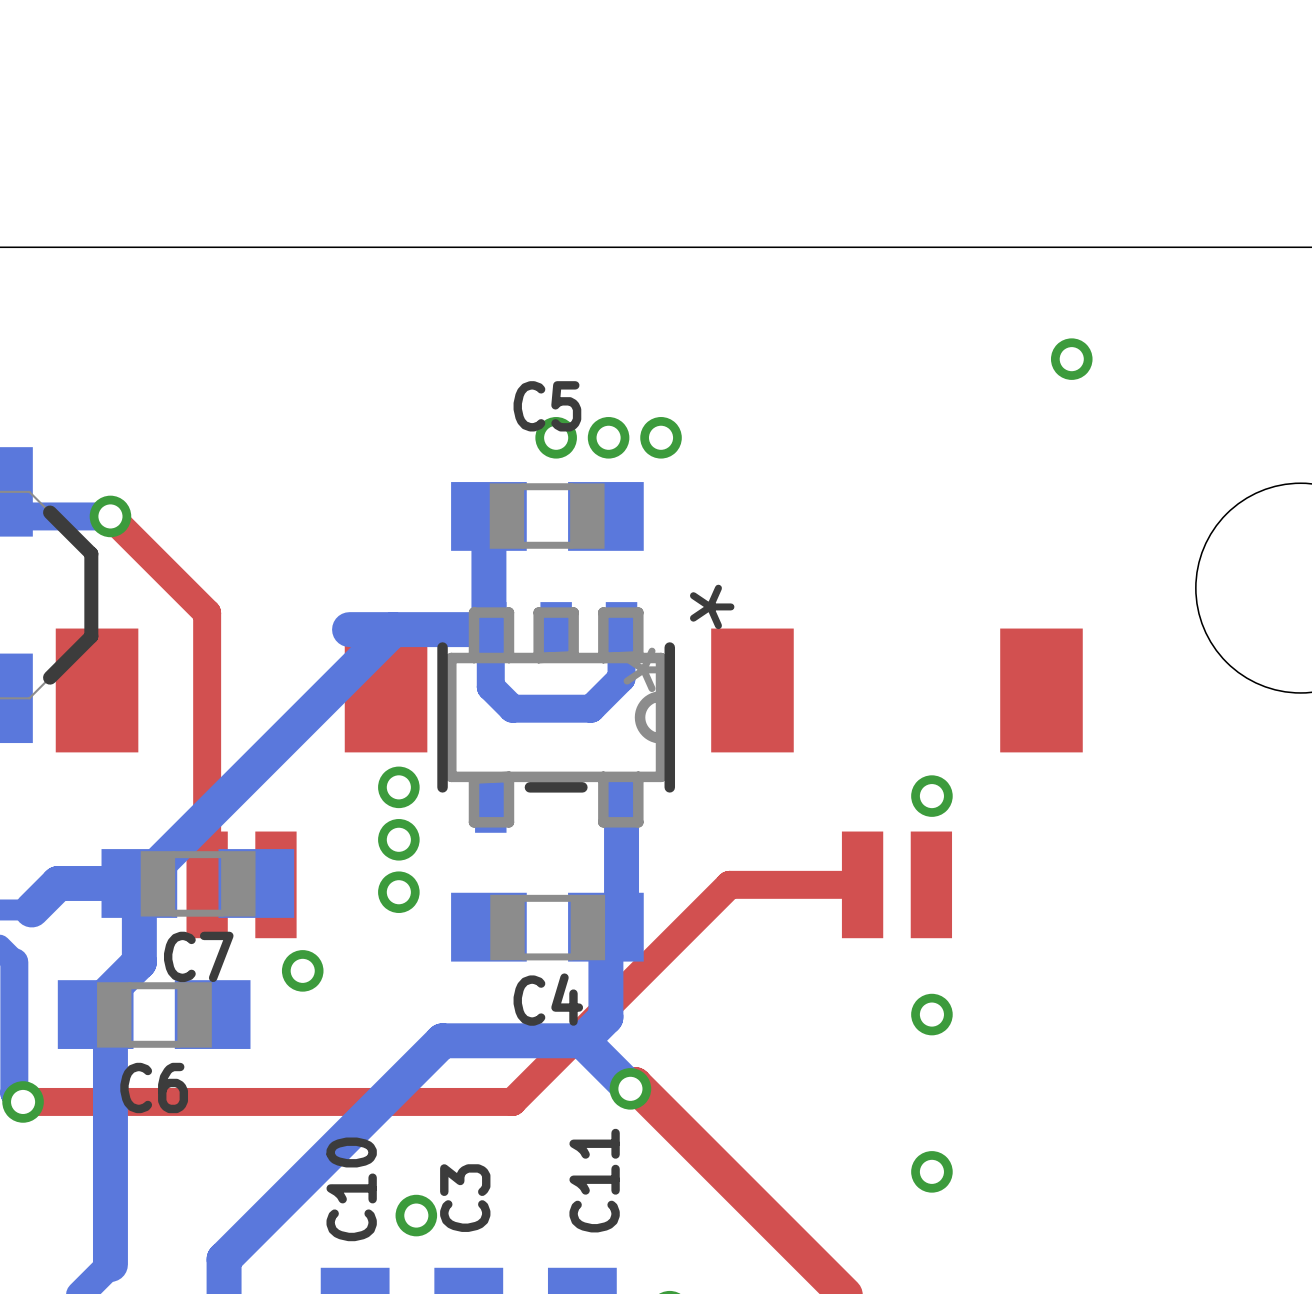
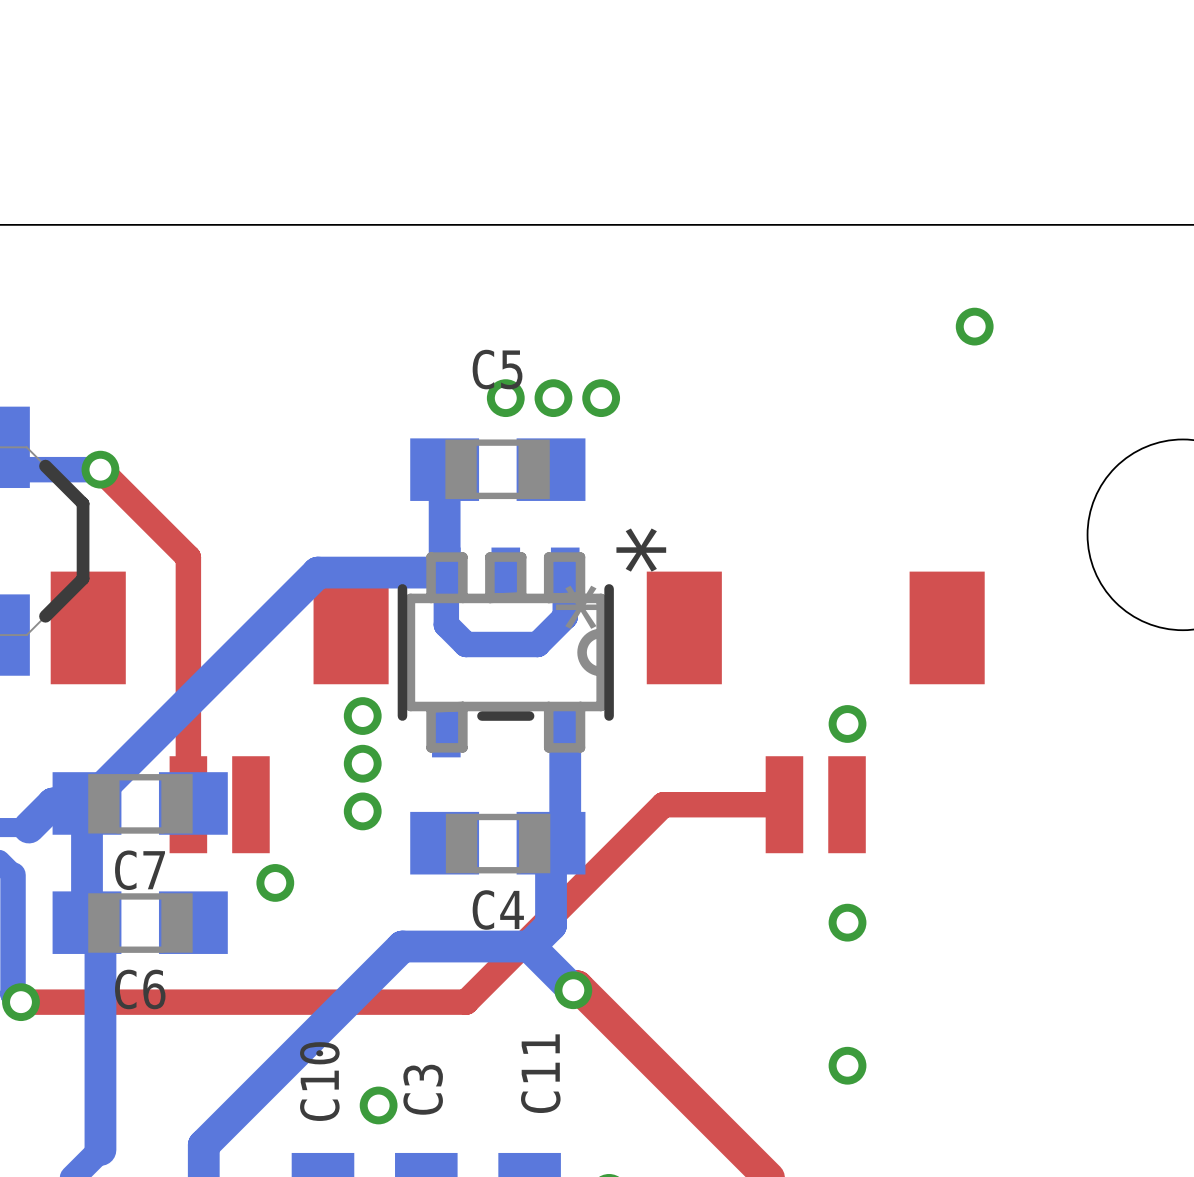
bottom track: (393, 629) (139, 883) -> none
bottom track: (139, 883) (139, 962) (95, 1005) -> (317, 572) (87, 803) (87, 914)
C7 position: (197, 883) -> (140, 803)

